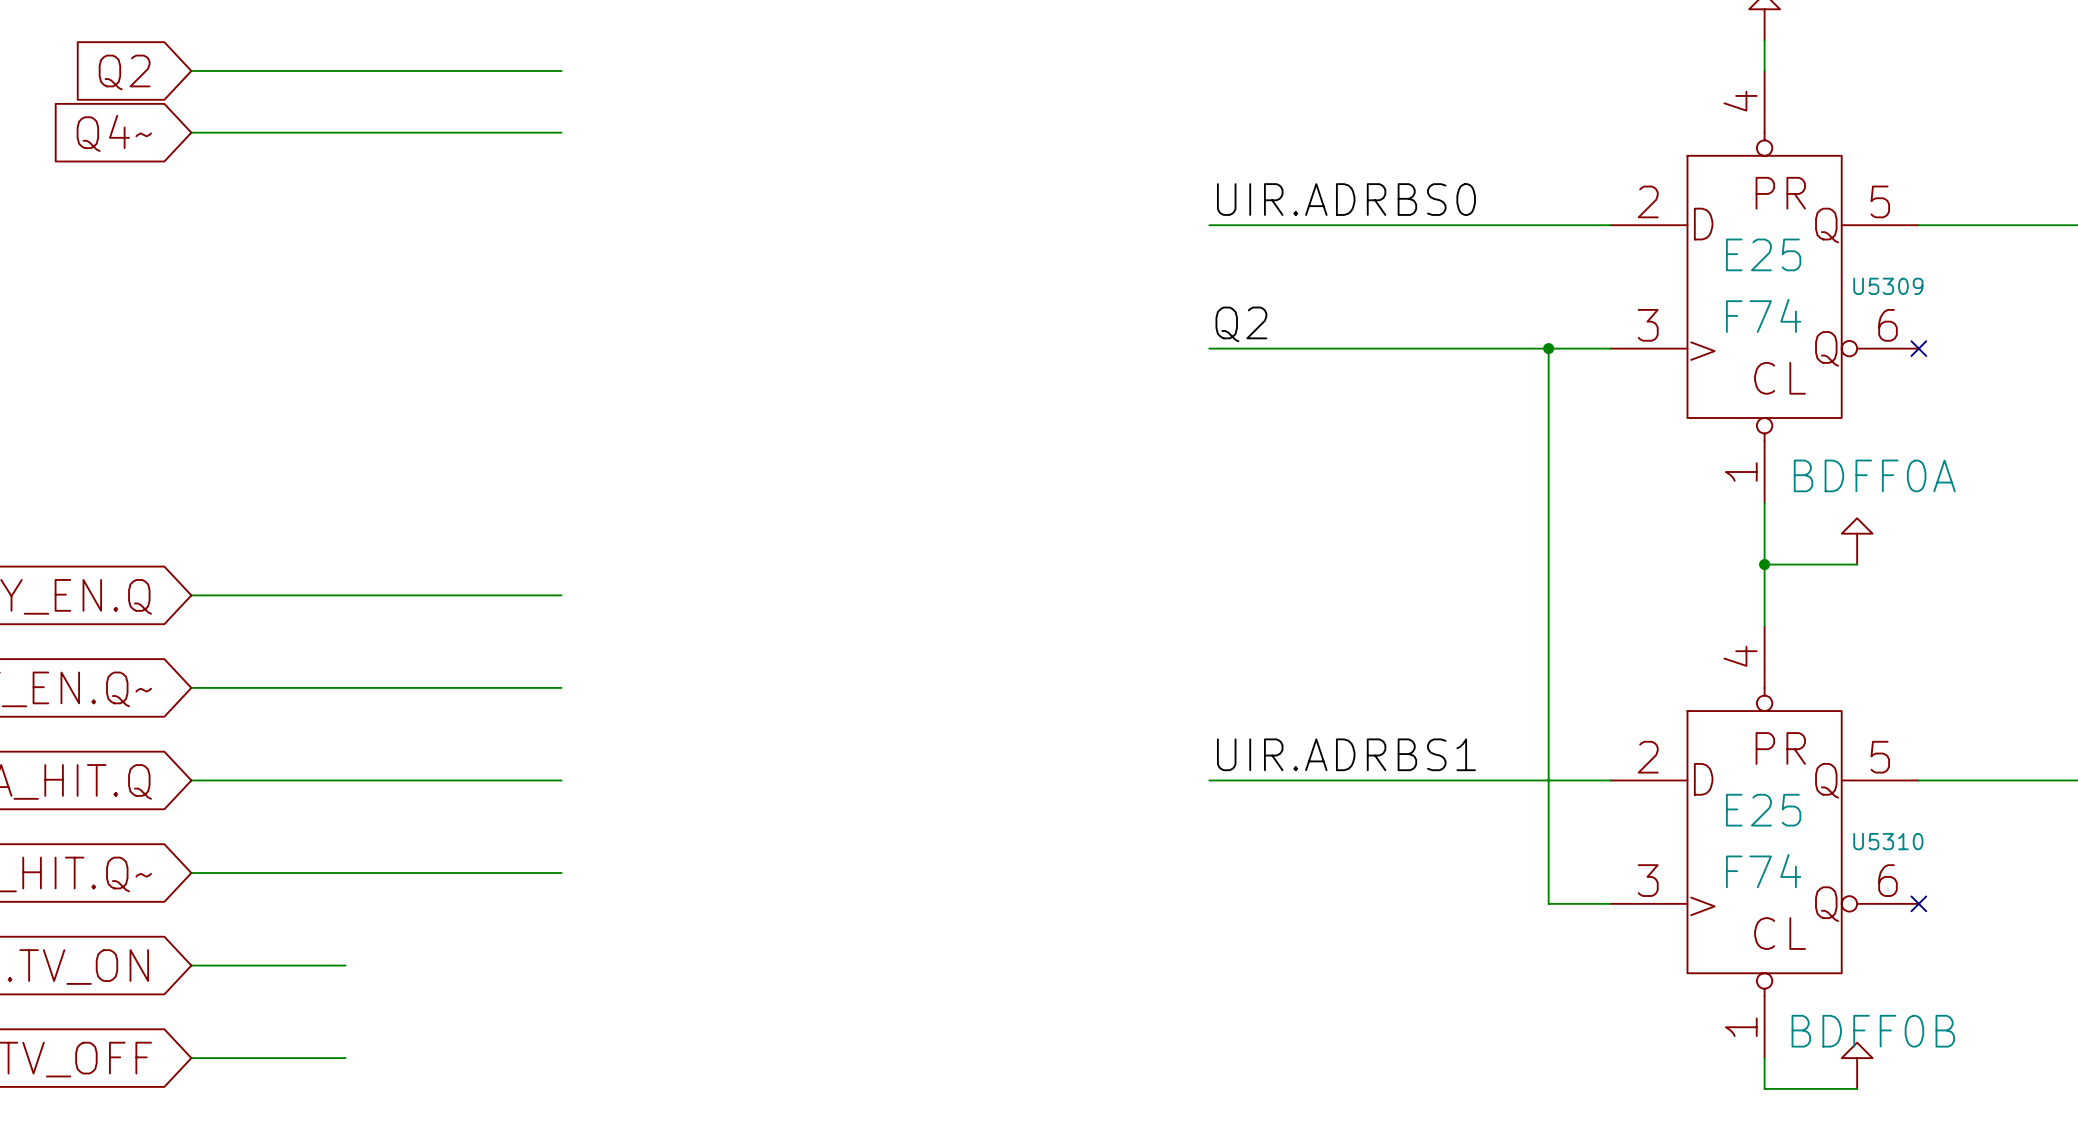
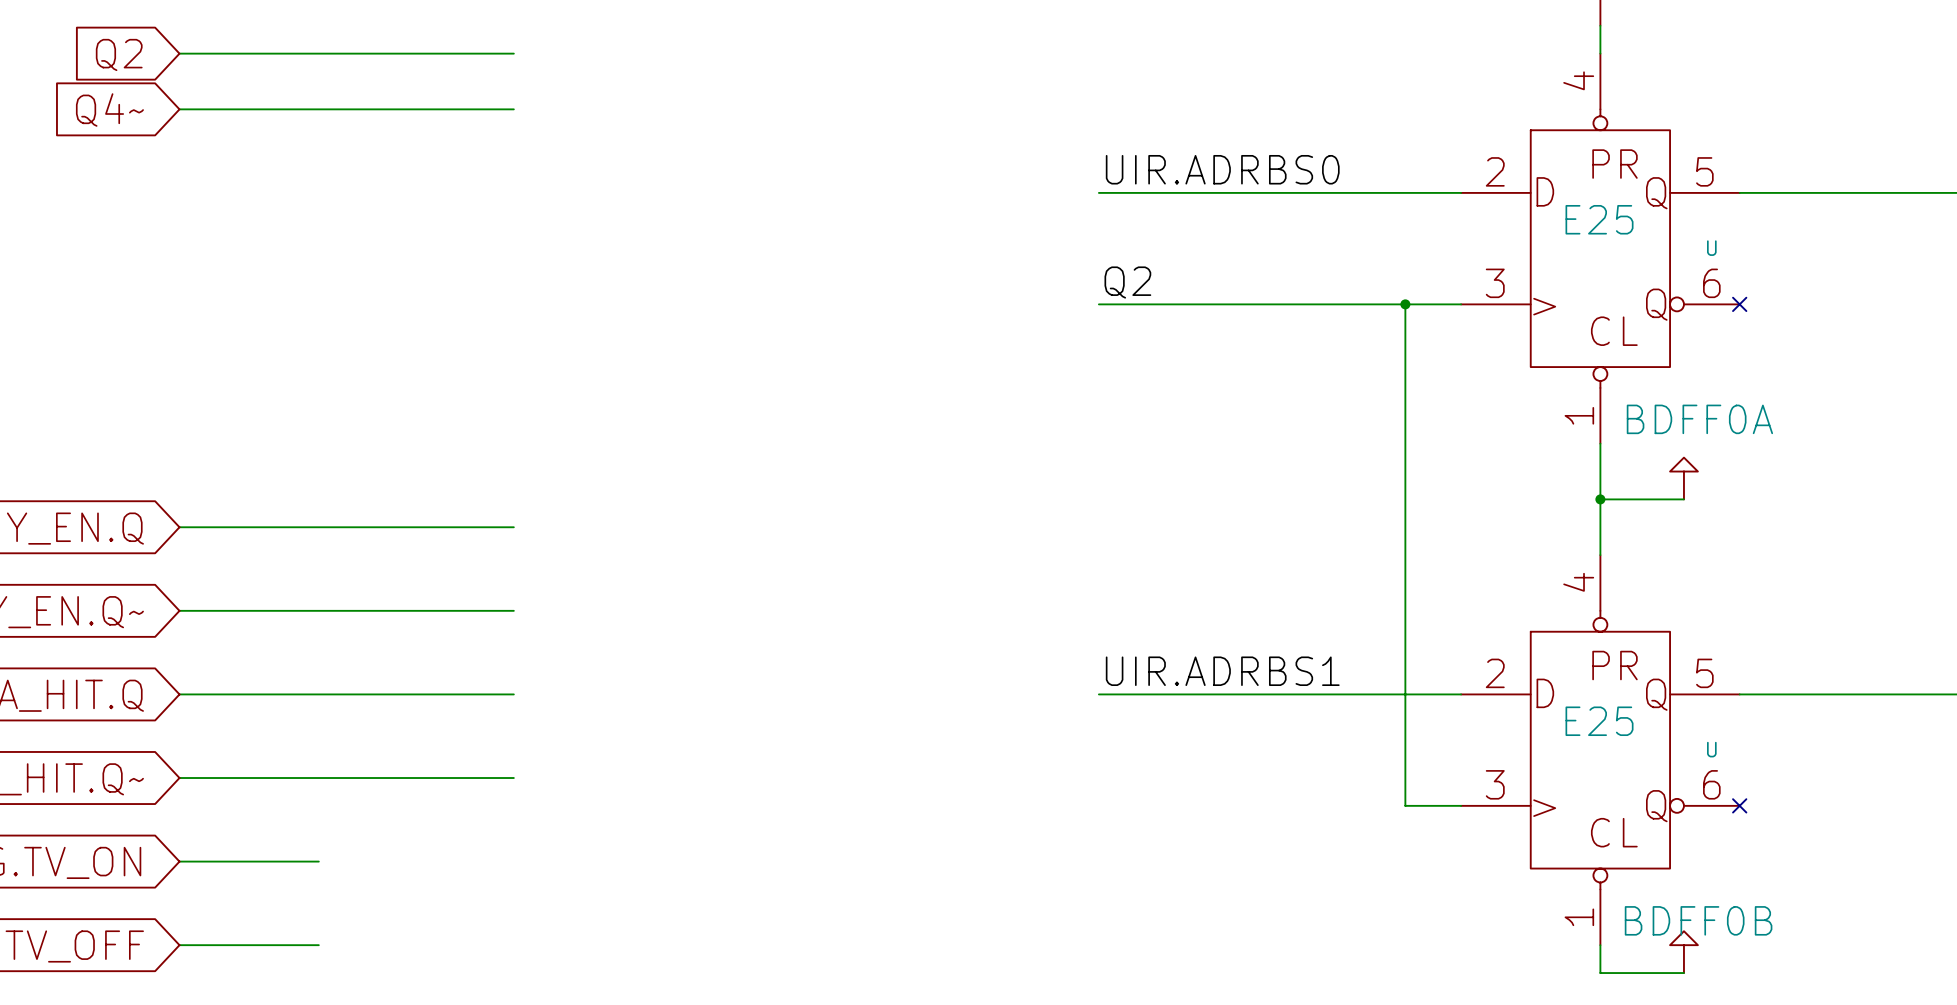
U5309 name: U5309 (1888, 286) -> U (1711, 248)
U5309 value: F74 (1763, 315) -> none
U5310 name: U5310 (1888, 841) -> U (1711, 749)
U5310 value: F74 (1763, 871) -> none

